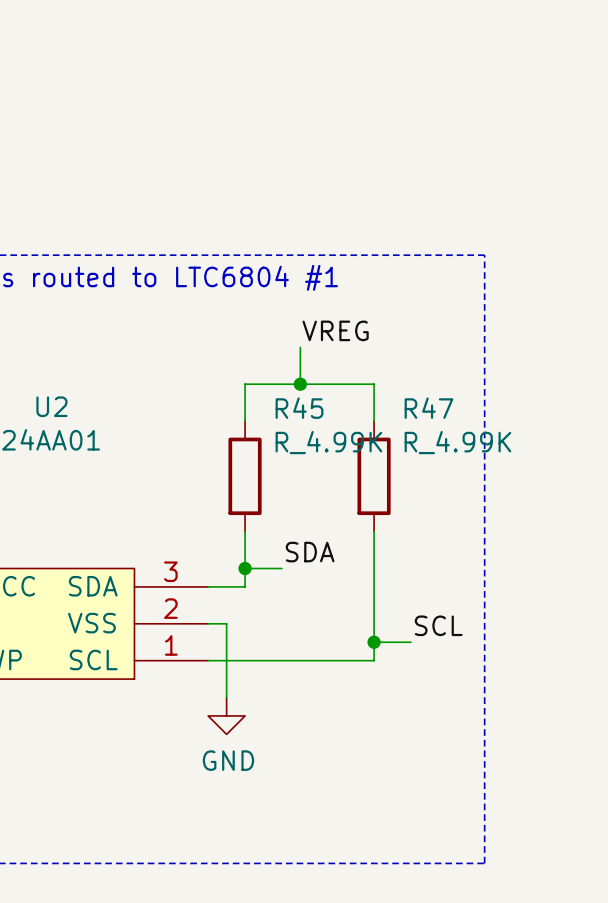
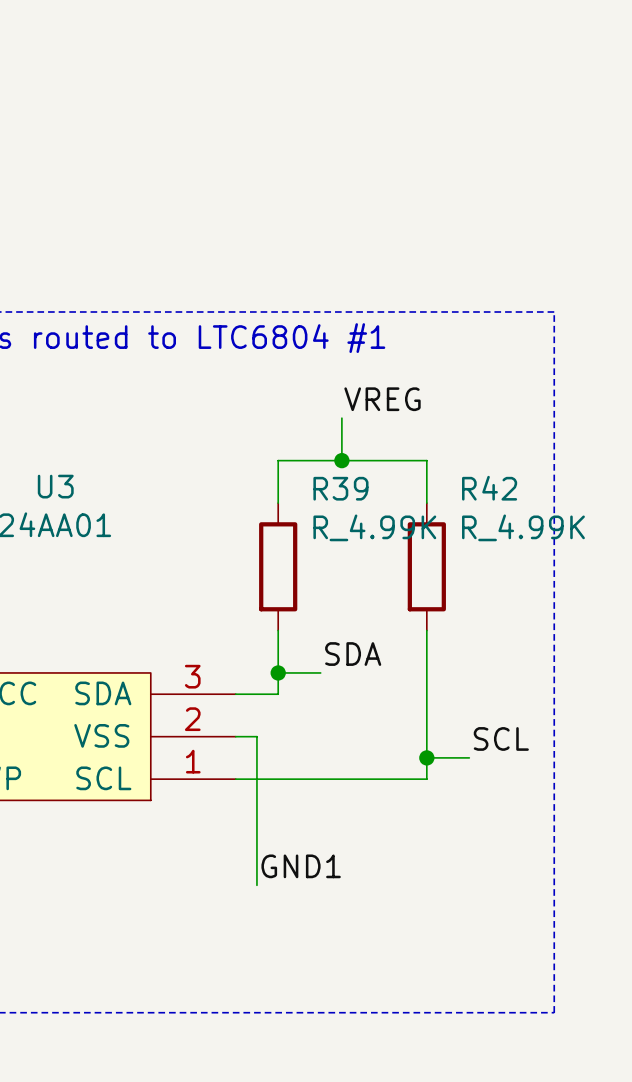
U2 name: U2 (51, 406) -> U3 (55, 486)
R45 name: R45 (299, 408) -> R39 (340, 488)
R47 name: R47 (428, 408) -> R42 (489, 488)
wire: none -> (256, 821) (256, 885)
power symbol: GND (226, 715) -> none
label: none -> GND1 (301, 866)

